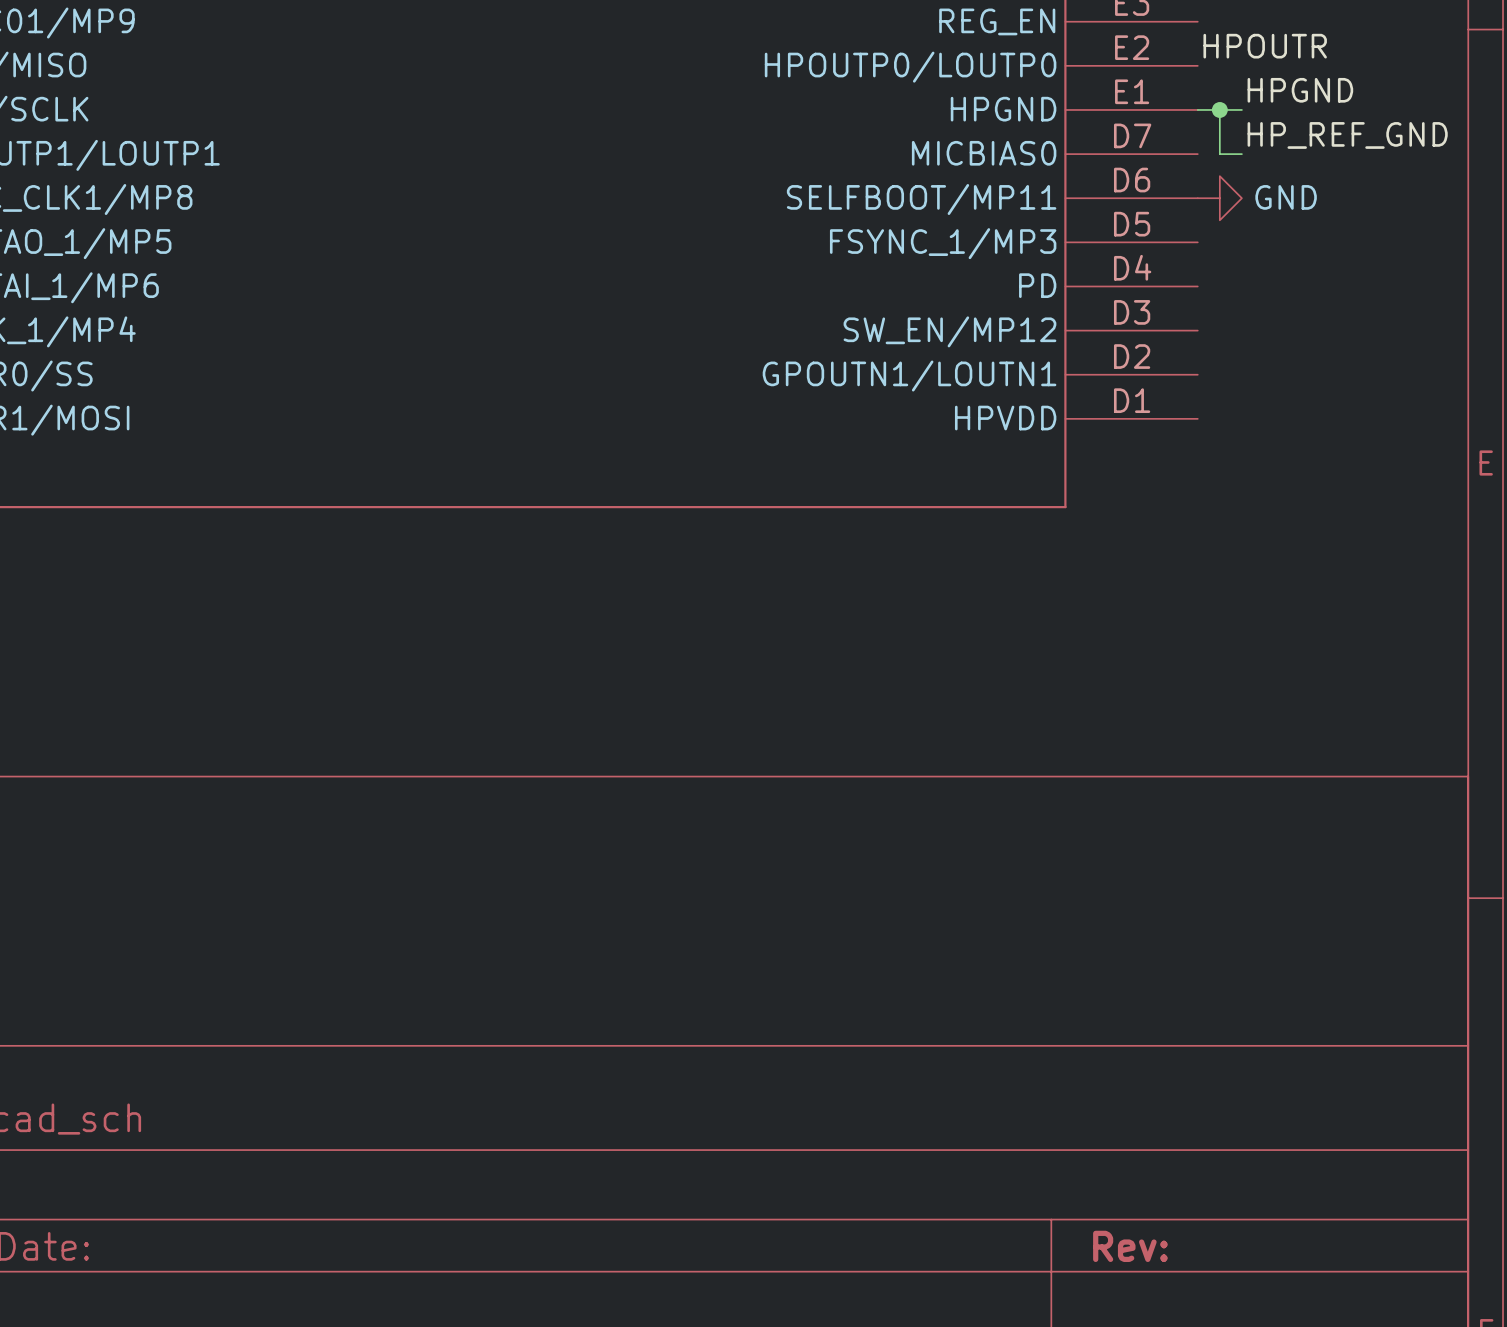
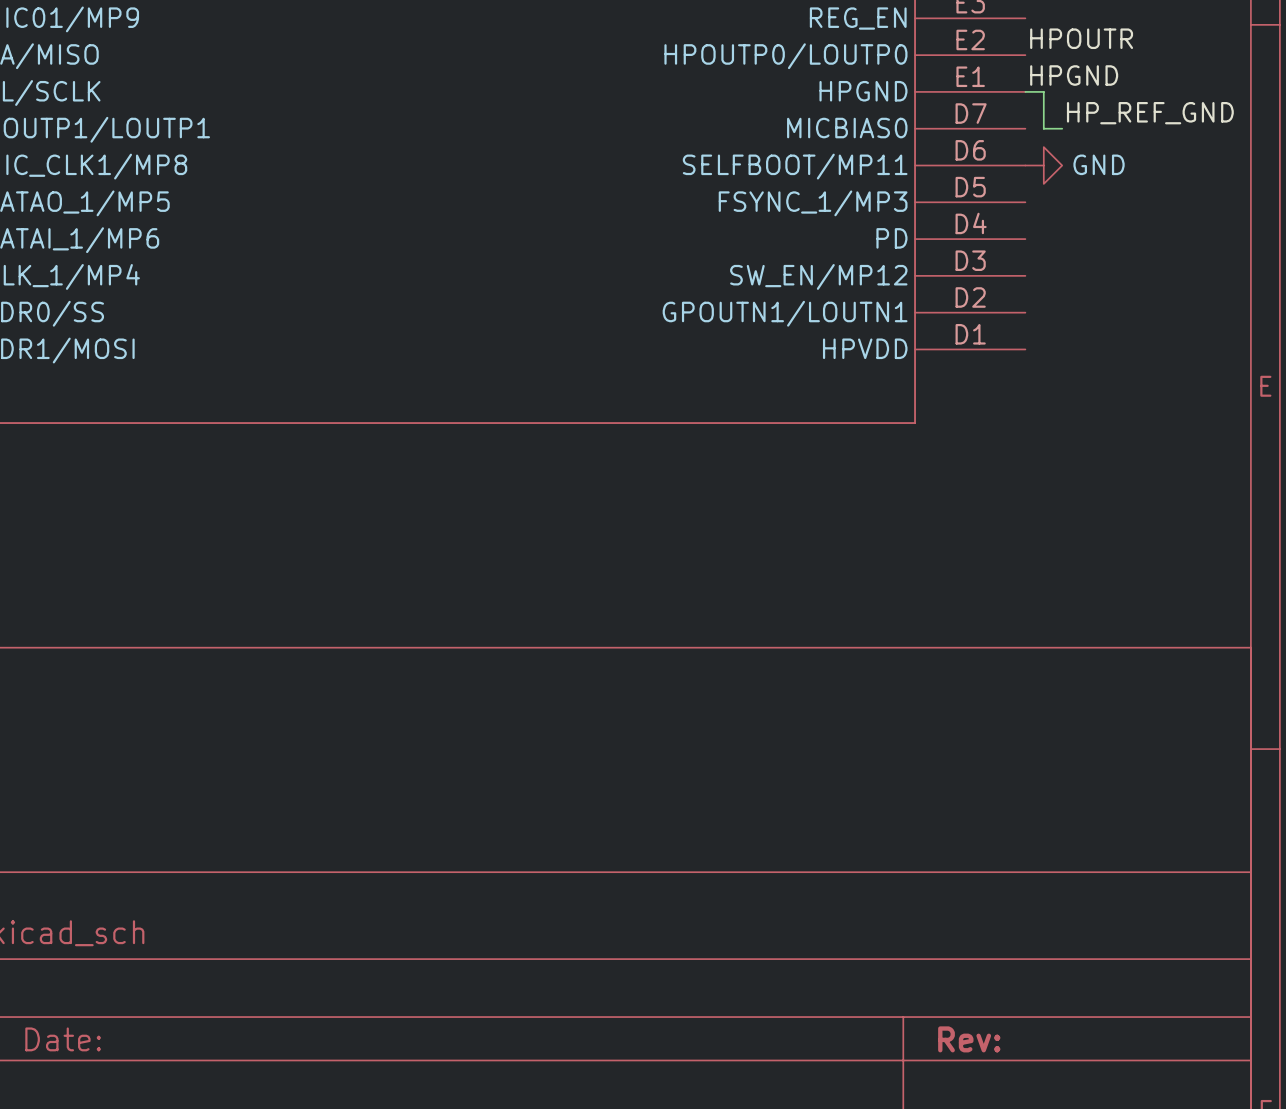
label position: HPGND (1300, 90) -> HPGND (1074, 75)
wire: (1219, 109) (1241, 109) -> none
junction: (1219, 109) -> none

